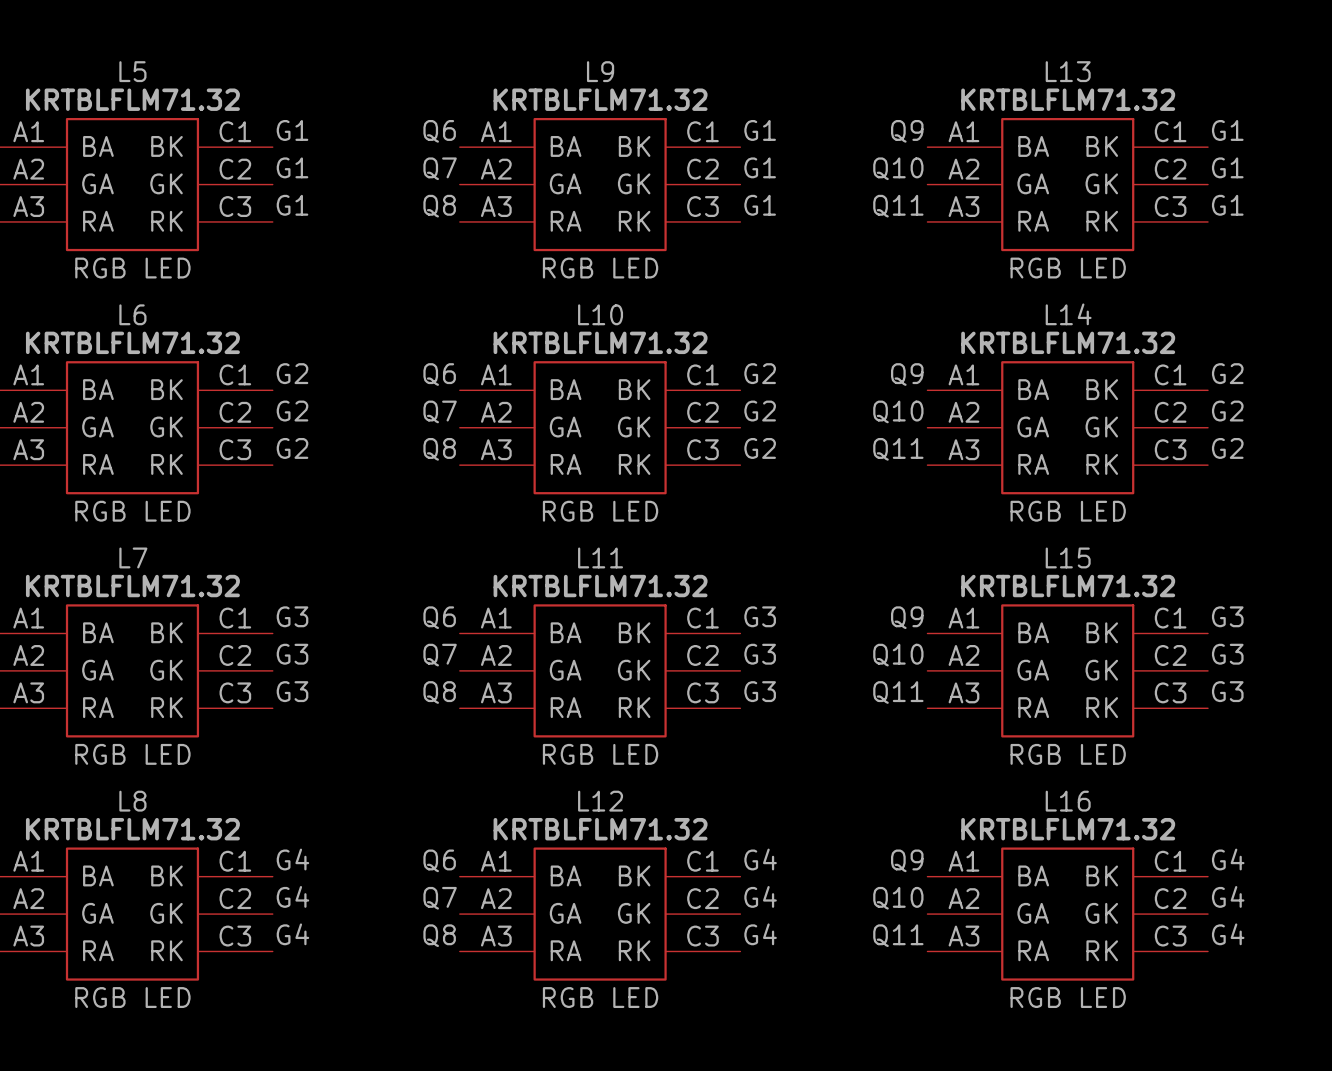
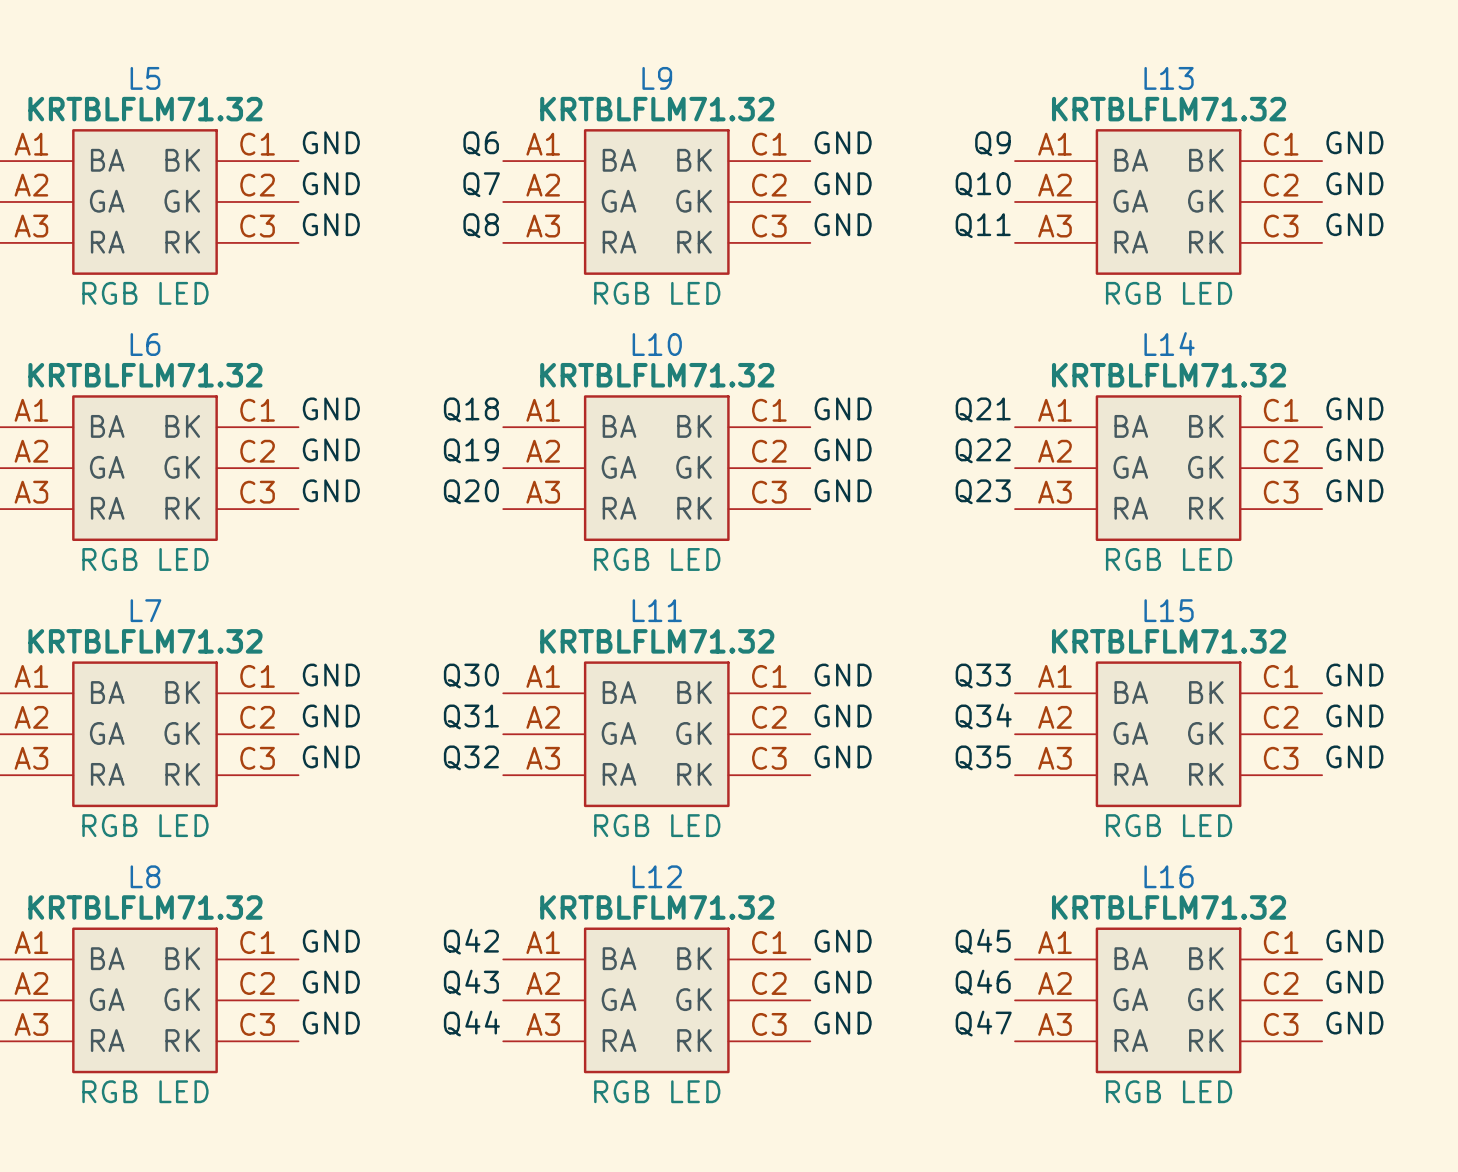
label: G1 (292, 130) -> GND (331, 142)
label: G1 (760, 130) -> GND (843, 142)
label: G1 (1227, 130) -> GND (1354, 142)
label: G1 (292, 167) -> GND (331, 183)
label: G1 (760, 167) -> GND (843, 183)
label: G1 (1227, 167) -> GND (1354, 183)
label: G1 (292, 205) -> GND (331, 224)
label: G1 (760, 205) -> GND (843, 224)
label: G1 (1227, 205) -> GND (1354, 224)
label: G2 (292, 373) -> GND (331, 408)
label: G2 (760, 373) -> GND (843, 408)
label: G2 (1227, 373) -> GND (1354, 408)
label: Q6 (439, 374) -> Q18 (471, 409)
label: Q9 (907, 374) -> Q21 (983, 409)
label: G2 (292, 411) -> GND (331, 449)
label: Q7 (440, 411) -> Q19 (471, 450)
label: G2 (760, 411) -> GND (843, 449)
label: Q10 (898, 411) -> Q22 (983, 450)
label: G2 (1227, 411) -> GND (1354, 449)
label: G2 (292, 448) -> GND (331, 490)
label: G2 (760, 448) -> GND (843, 490)
label: G2 (1227, 448) -> GND (1354, 490)
label: Q8 (439, 449) -> Q20 (471, 491)
label: Q11 (898, 449) -> Q23 (983, 491)
label: G3 (292, 616) -> GND (331, 675)
label: G3 (760, 616) -> GND (843, 675)
label: G3 (1227, 616) -> GND (1354, 675)
label: Q6 (439, 617) -> Q30 (471, 676)
label: Q9 (907, 617) -> Q33 (983, 676)
label: G3 (292, 654) -> GND (331, 715)
label: G3 (760, 654) -> GND (843, 715)
label: G3 (1227, 654) -> GND (1354, 715)
label: Q7 (440, 655) -> Q31 (471, 716)
label: Q10 (898, 655) -> Q34 (983, 716)
label: G3 (292, 691) -> GND (331, 756)
label: G3 (760, 691) -> GND (843, 756)
label: G3 (1227, 691) -> GND (1354, 756)
label: Q8 (439, 692) -> Q32 (471, 757)
label: Q11 (898, 692) -> Q35 (983, 757)
label: G4 (292, 859) -> GND (331, 941)
label: G4 (760, 859) -> GND (843, 941)
label: G4 (1228, 859) -> GND (1354, 941)
label: Q6 (439, 860) -> Q42 (471, 941)
label: Q9 (907, 860) -> Q45 (983, 941)
label: G4 (292, 896) -> GND (331, 982)
label: G4 (760, 896) -> GND (843, 982)
label: G4 (1228, 896) -> GND (1354, 982)
label: Q7 (440, 898) -> Q43 (471, 982)
label: Q10 (898, 898) -> Q46 (983, 982)
label: G4 (292, 934) -> GND (331, 1023)
label: G4 (760, 934) -> GND (843, 1023)
label: G4 (1228, 934) -> GND (1354, 1023)
label: Q8 (439, 935) -> Q44 (471, 1023)
label: Q11 (898, 935) -> Q47 (983, 1023)

